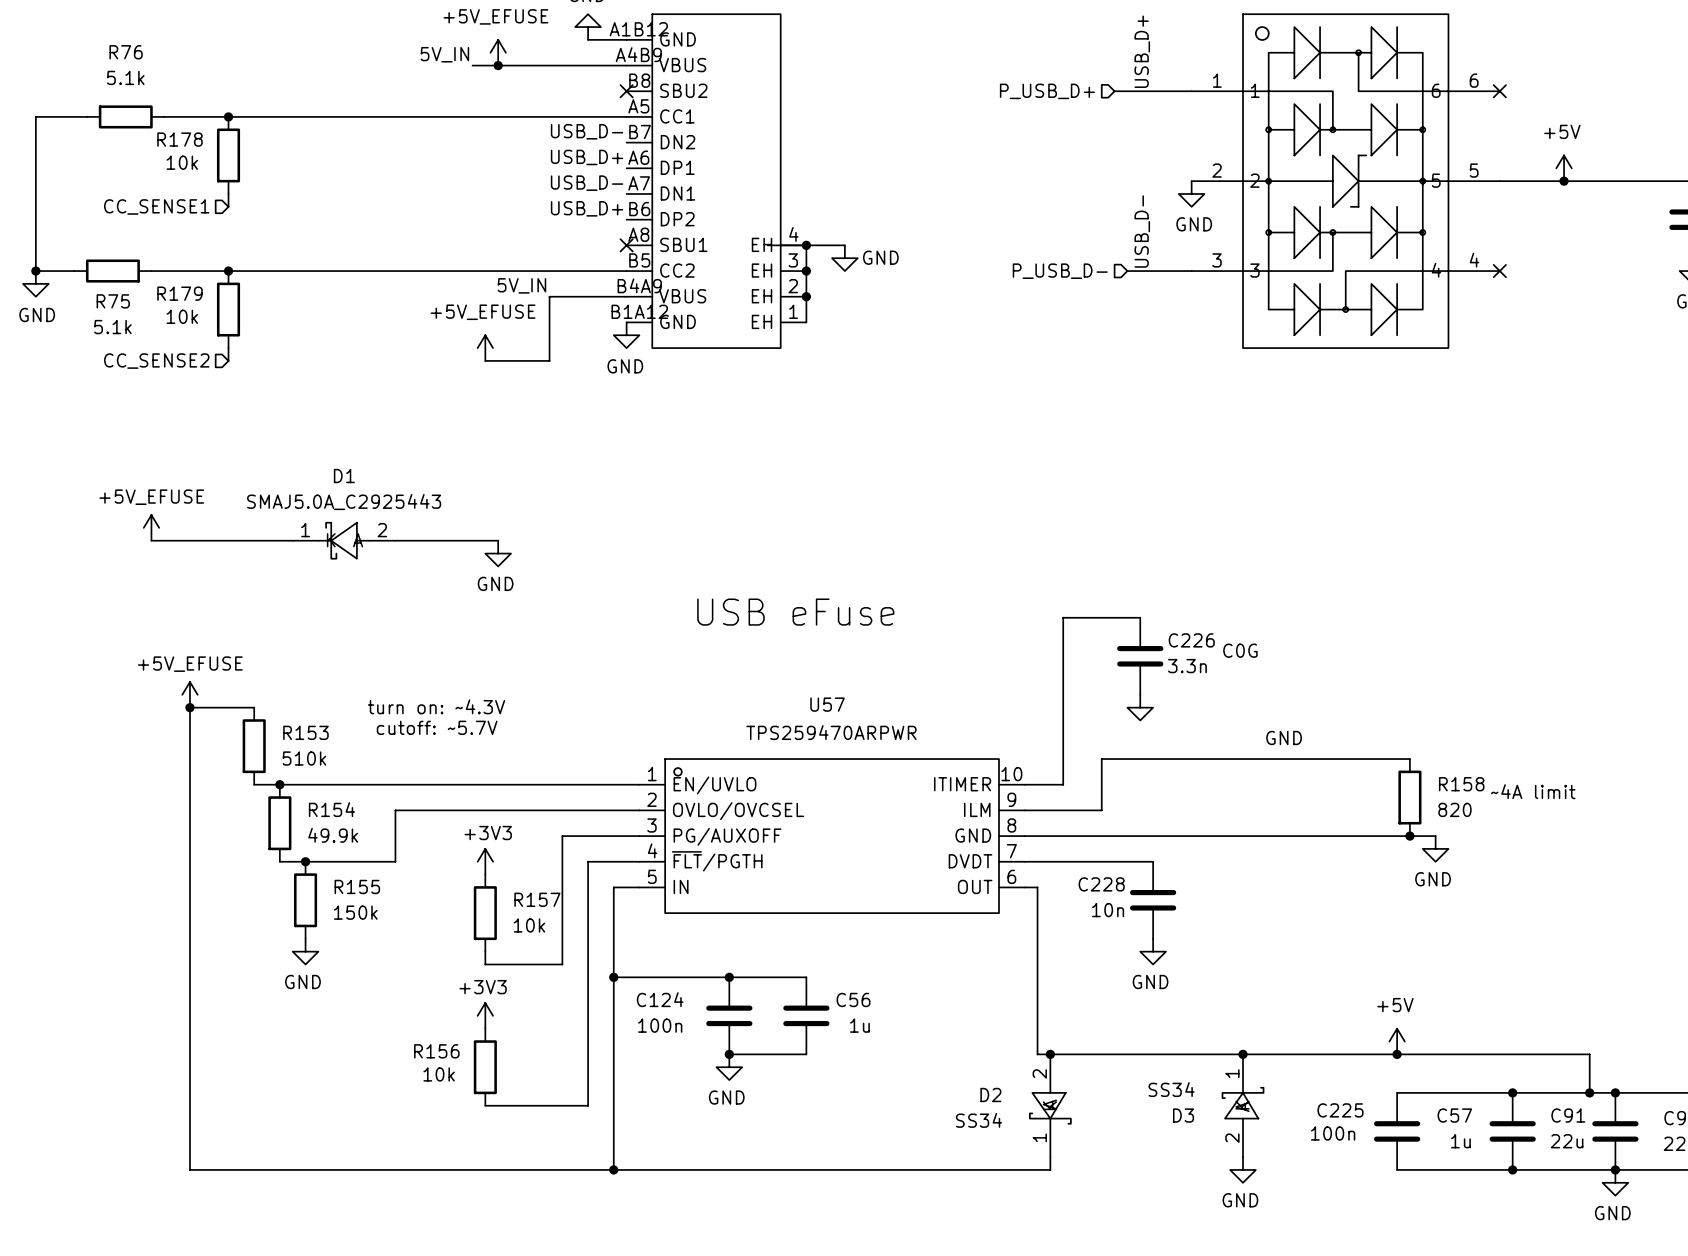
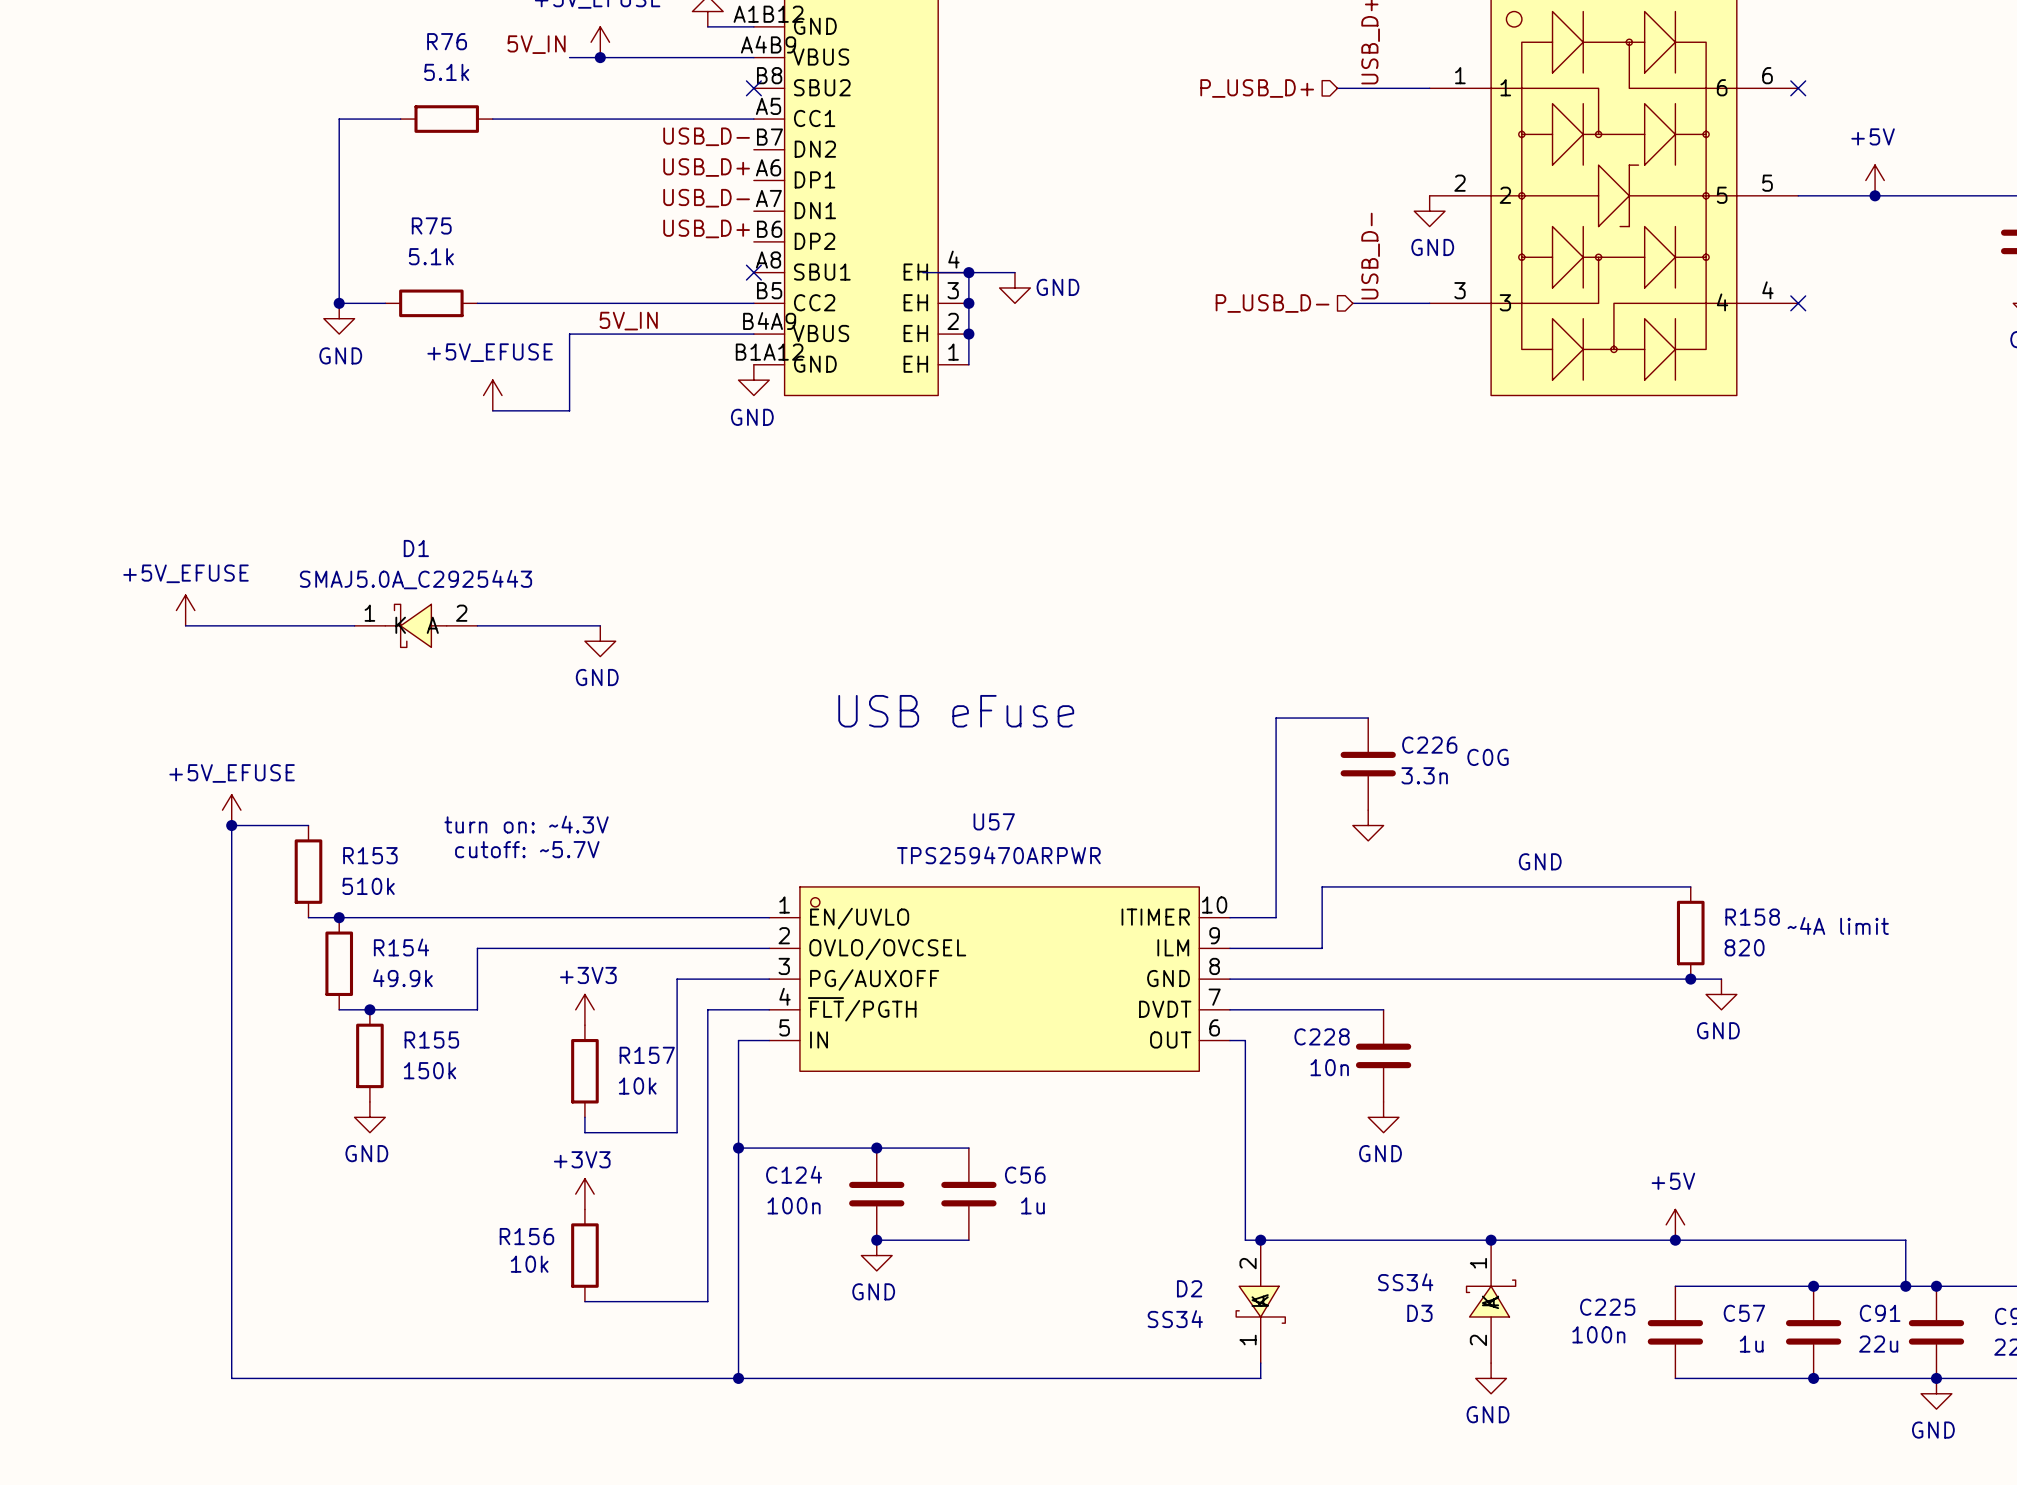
wire: (87, 116) (35, 116) (35, 271) (74, 271) -> none
R76 position: (125, 116) -> (446, 119)
wire: (164, 116) (279, 116) -> (339, 303) (339, 119)
junction: (228, 116) -> none
wire: (331, 116) (408, 116) -> none
R178: 10k (228, 155) -> none
wire: (228, 193) (228, 206) -> none
hierarchical label: CC_SENSE1 (156, 206) -> none
junction: (35, 271) -> none
R75 position: (112, 271) -> (431, 303)
wire: (151, 271) (279, 271) -> none
junction position: (228, 271) -> (339, 303)
wire: (318, 271) (395, 271) -> none
power symbol position: GND (35, 283) -> GND (339, 318)
wire: (549, 296) (549, 360) (485, 360) -> (661, 334) (569, 334) (569, 410) (492, 410)
R75 name position: R75 (113, 301) -> R75 (431, 225)
R179: 10k (228, 309) -> none
R75 value position: 5.1k (112, 327) -> 5.1k (431, 256)
wire: (228, 348) (228, 360) -> none
power symbol position: +5V_EFUSE (485, 348) -> +5V_EFUSE (492, 395)
hierarchical label: CC_SENSE2 (156, 361) -> none

